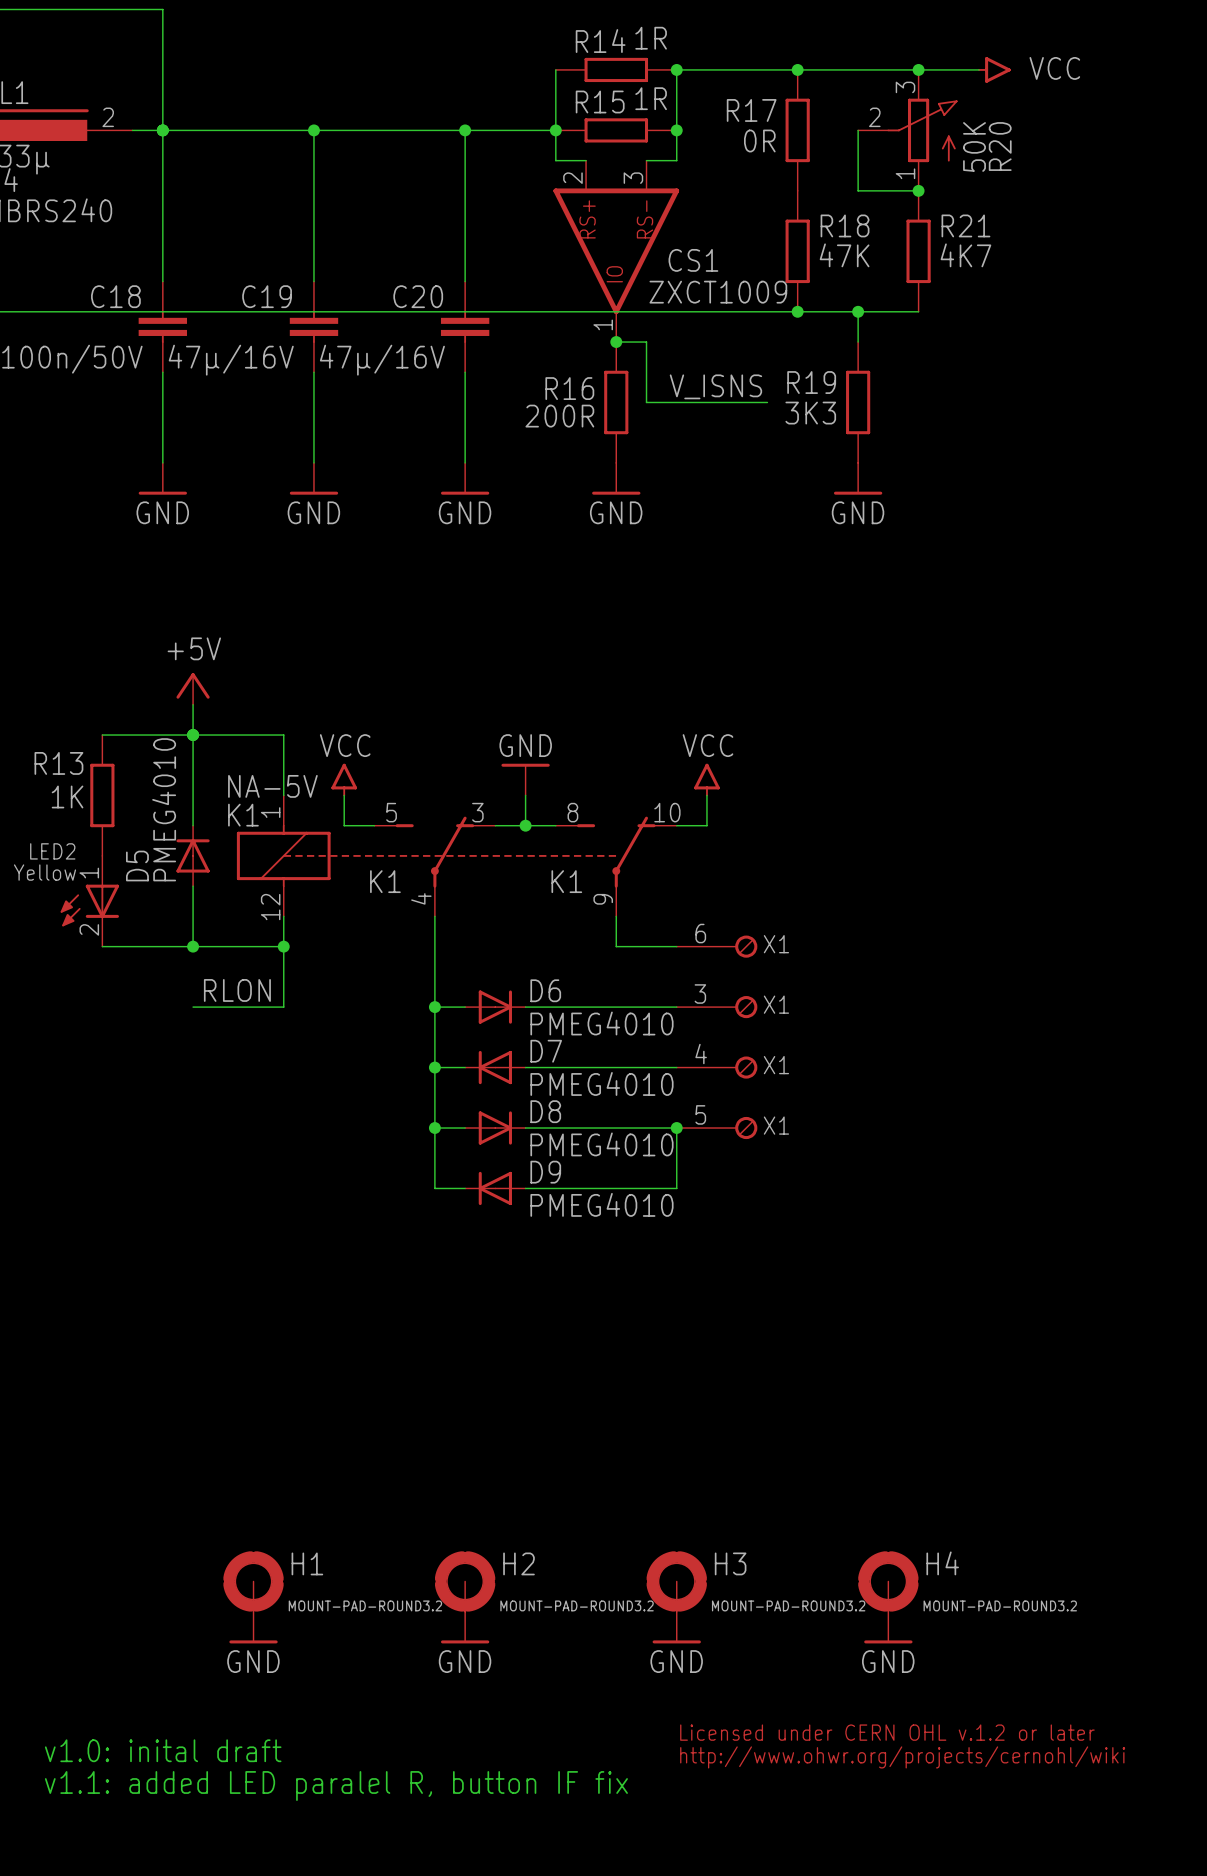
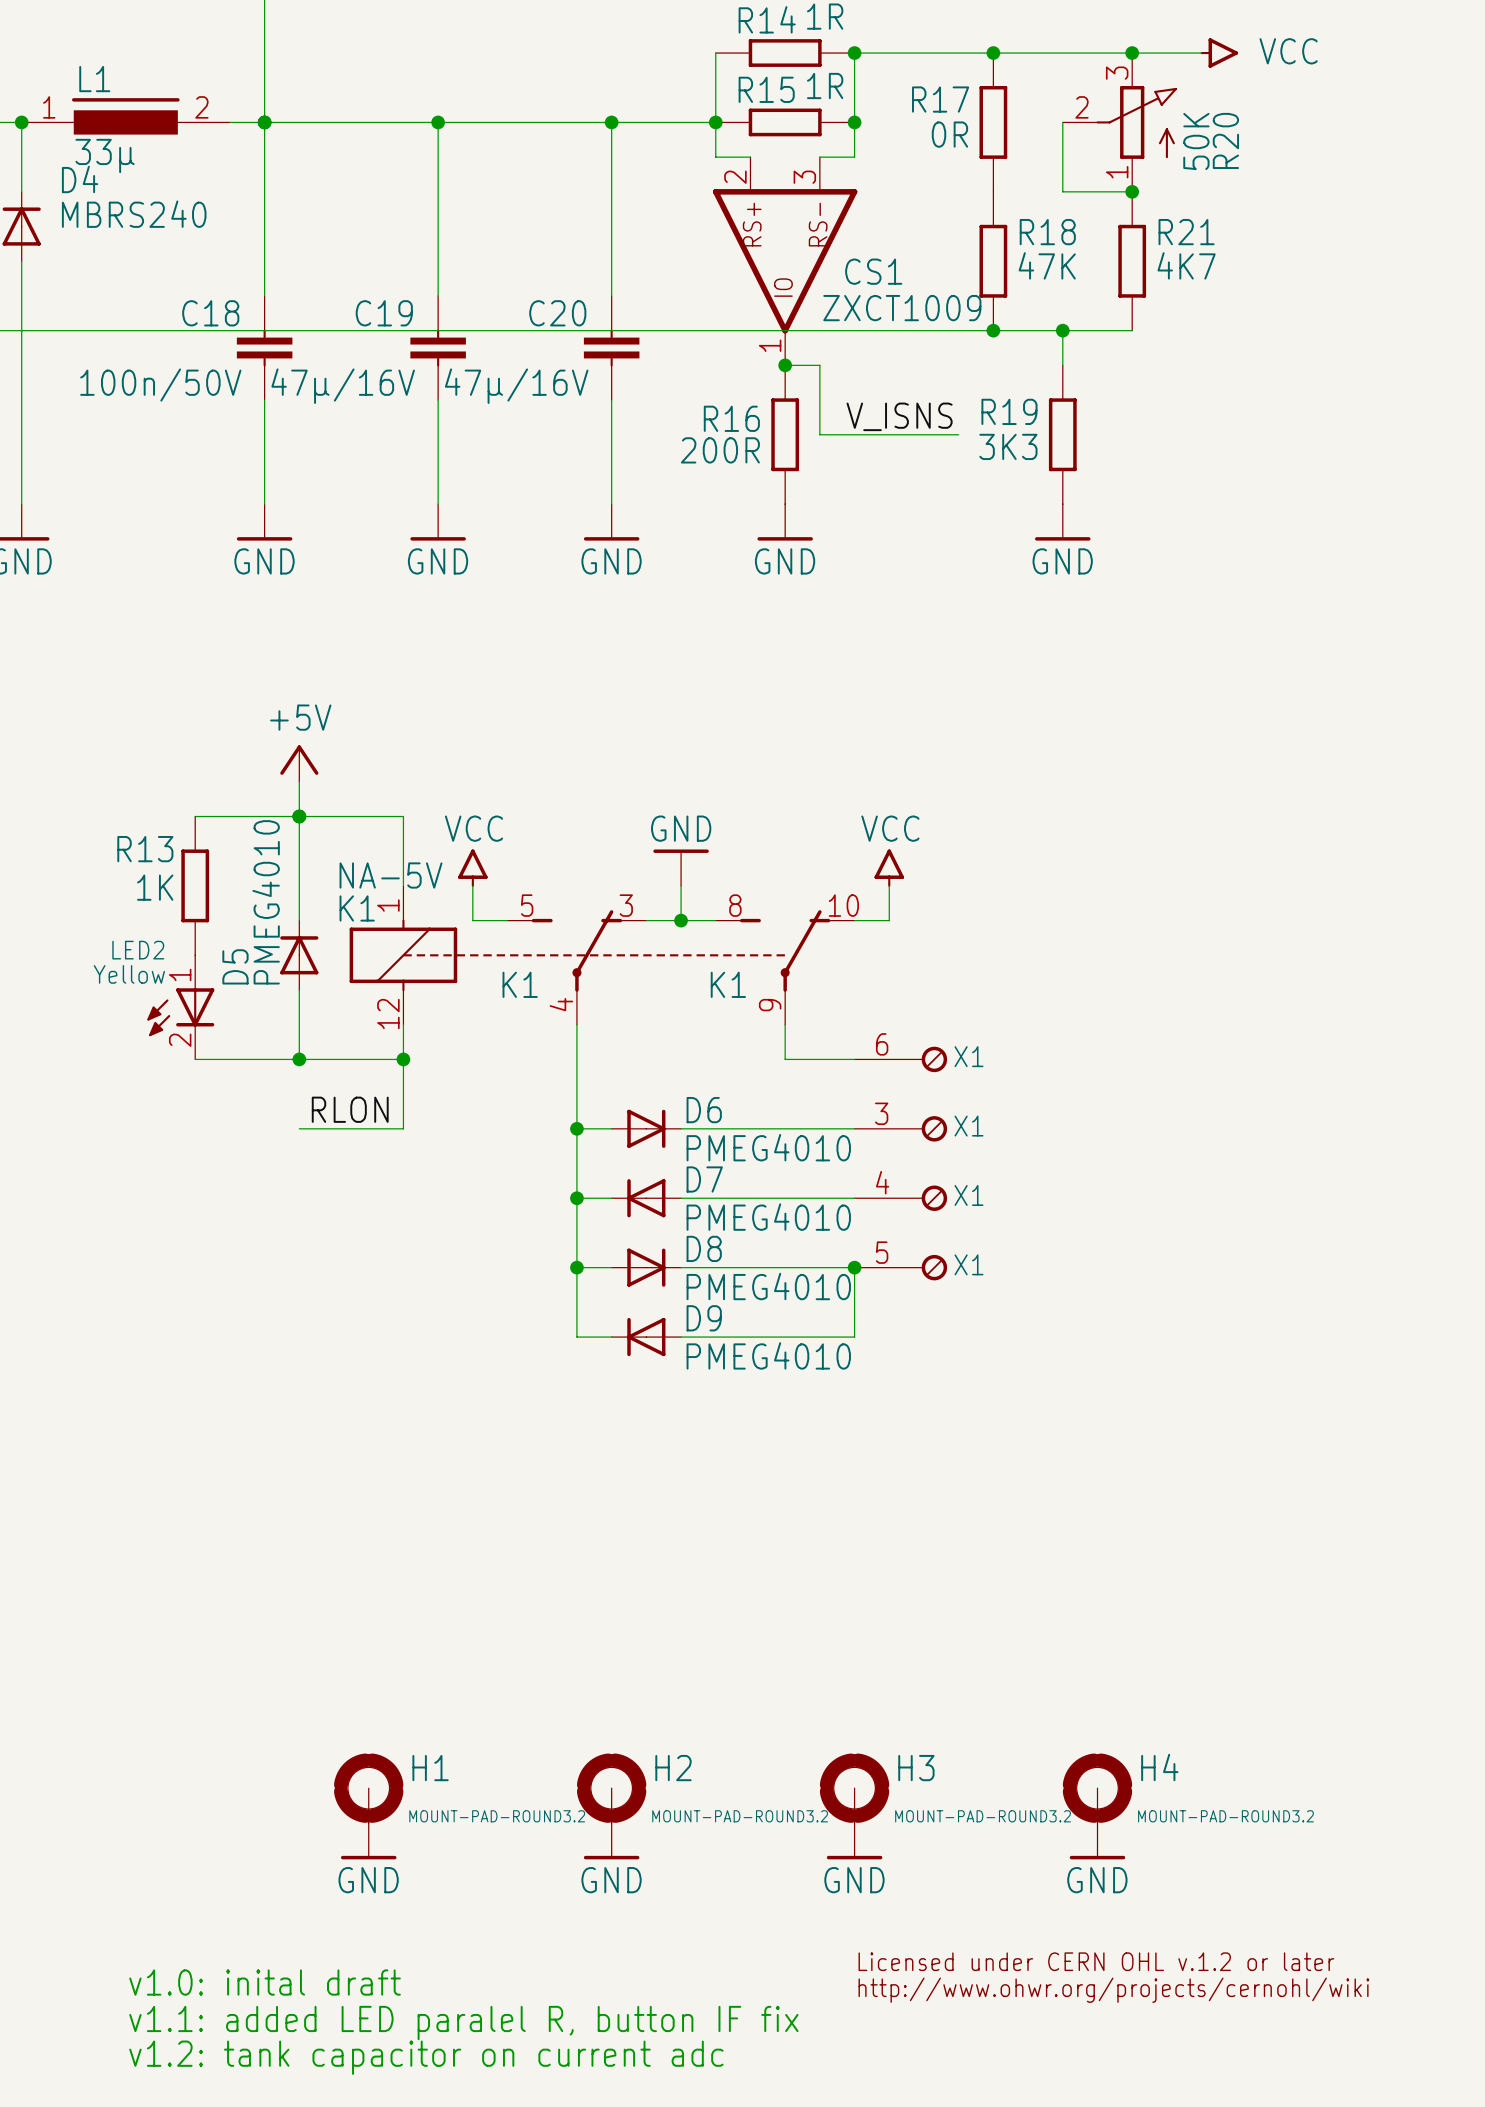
text: none -> v1.2: tank capacitor on current adc (426, 2057)

